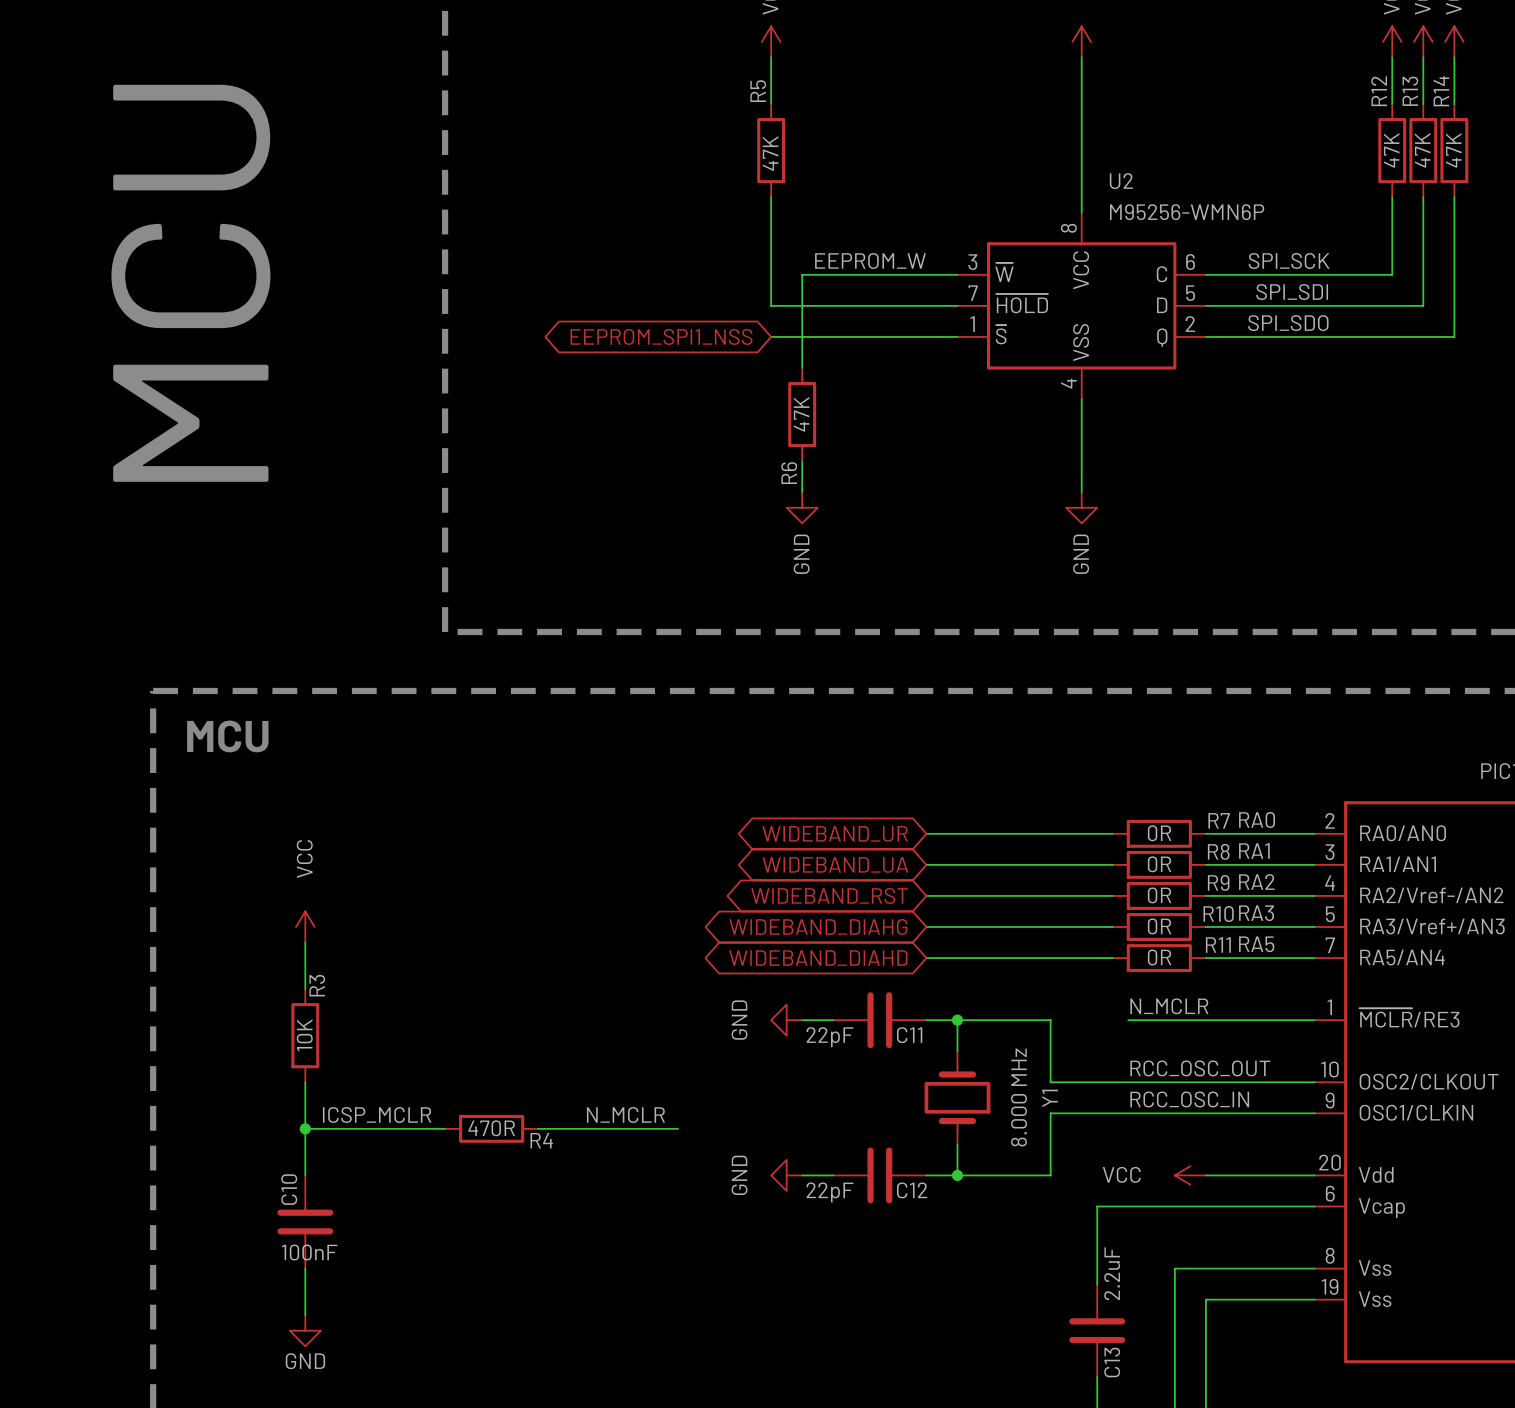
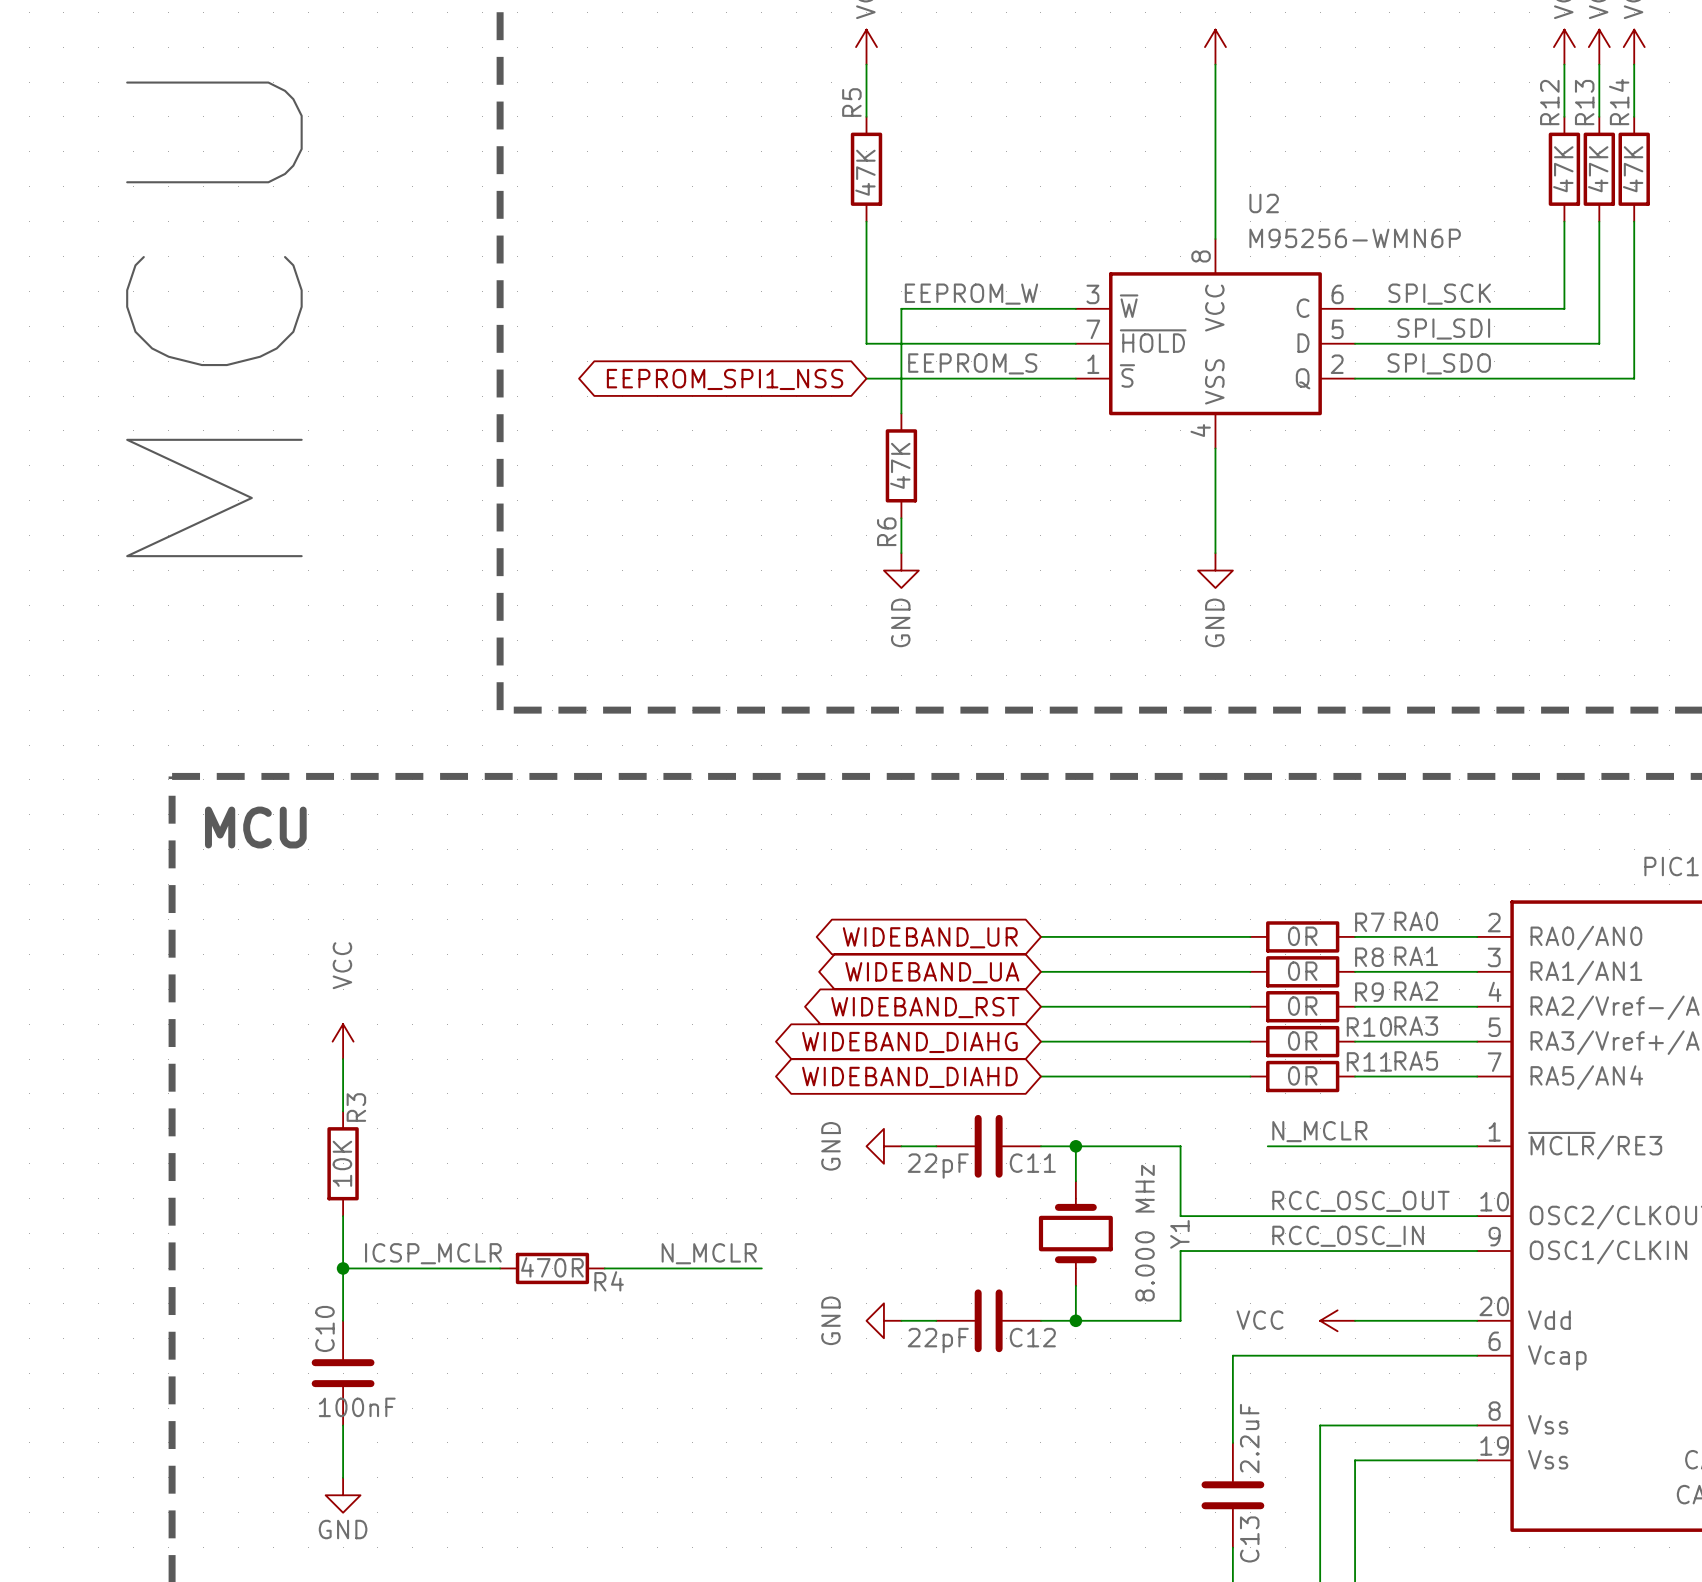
label: none -> EEPROM_S (972, 363)

